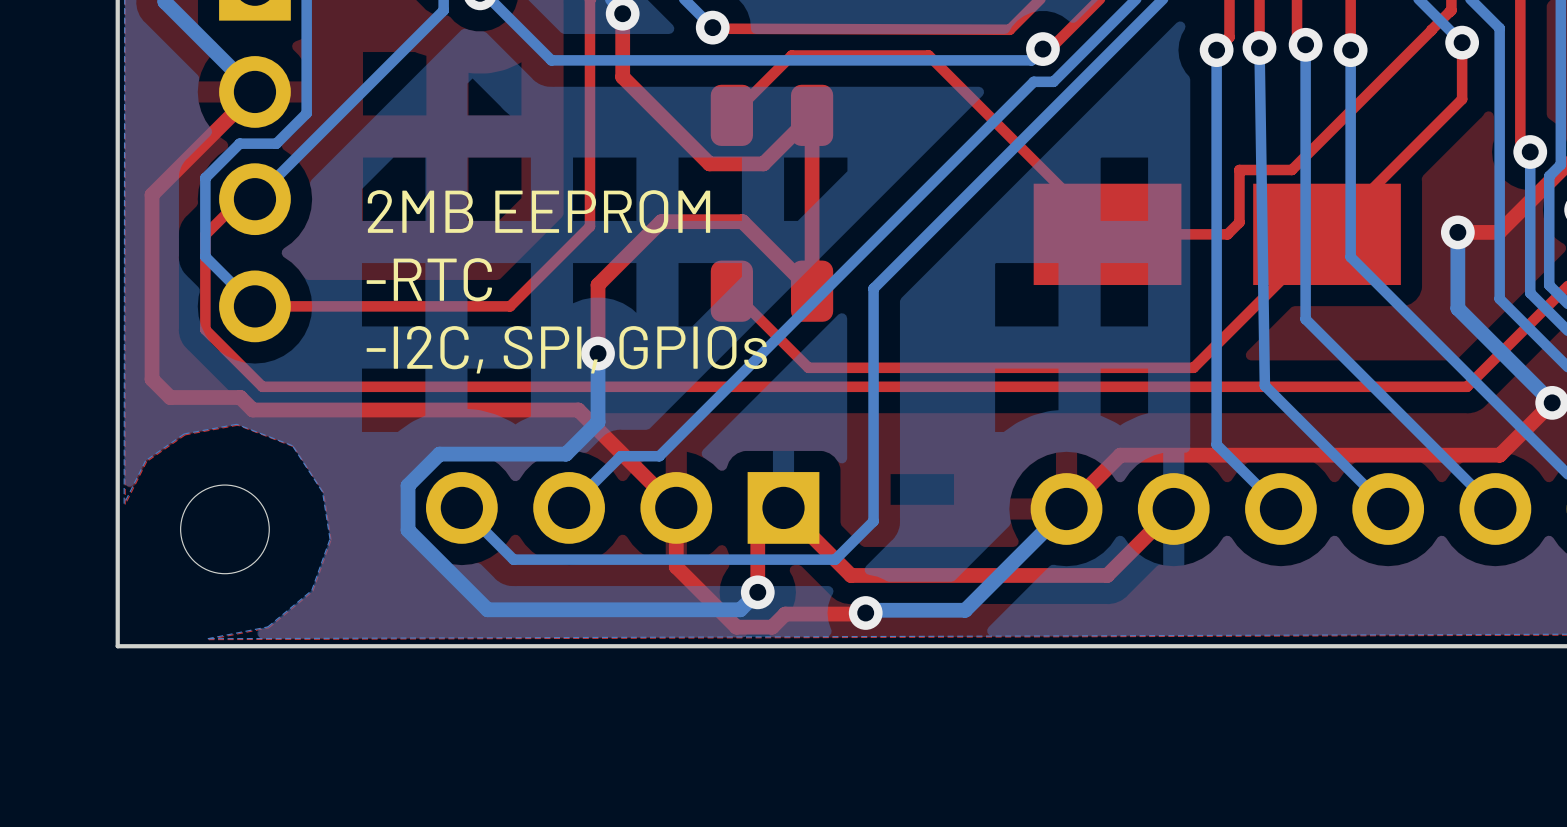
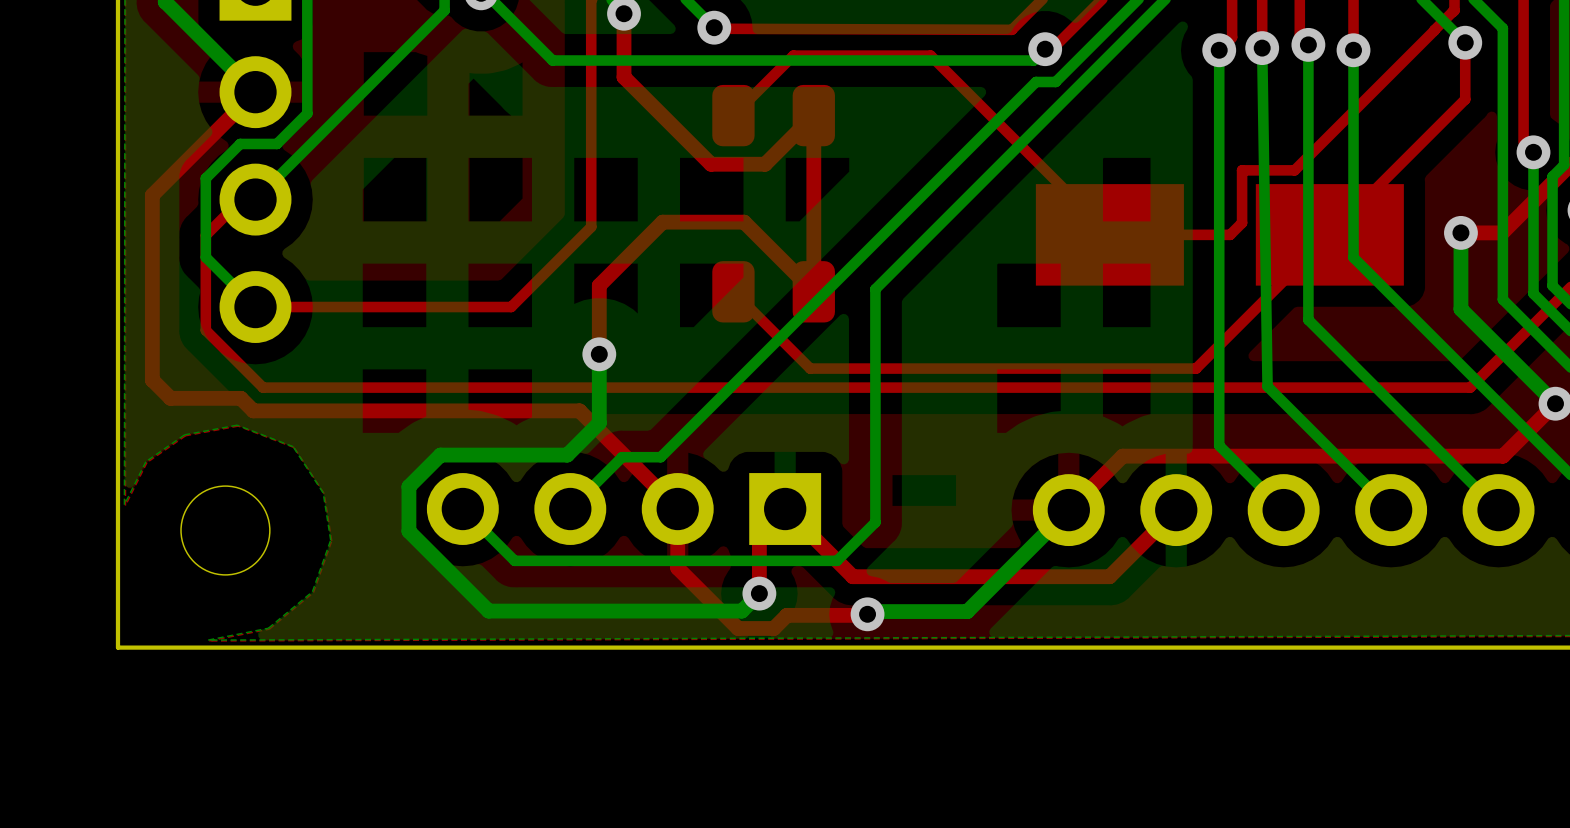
text: 2MB EEPROM (538, 211) -> none
text: -RTC (429, 279) -> none
text: -I2C, SPI, GPIOs (566, 349) -> none

